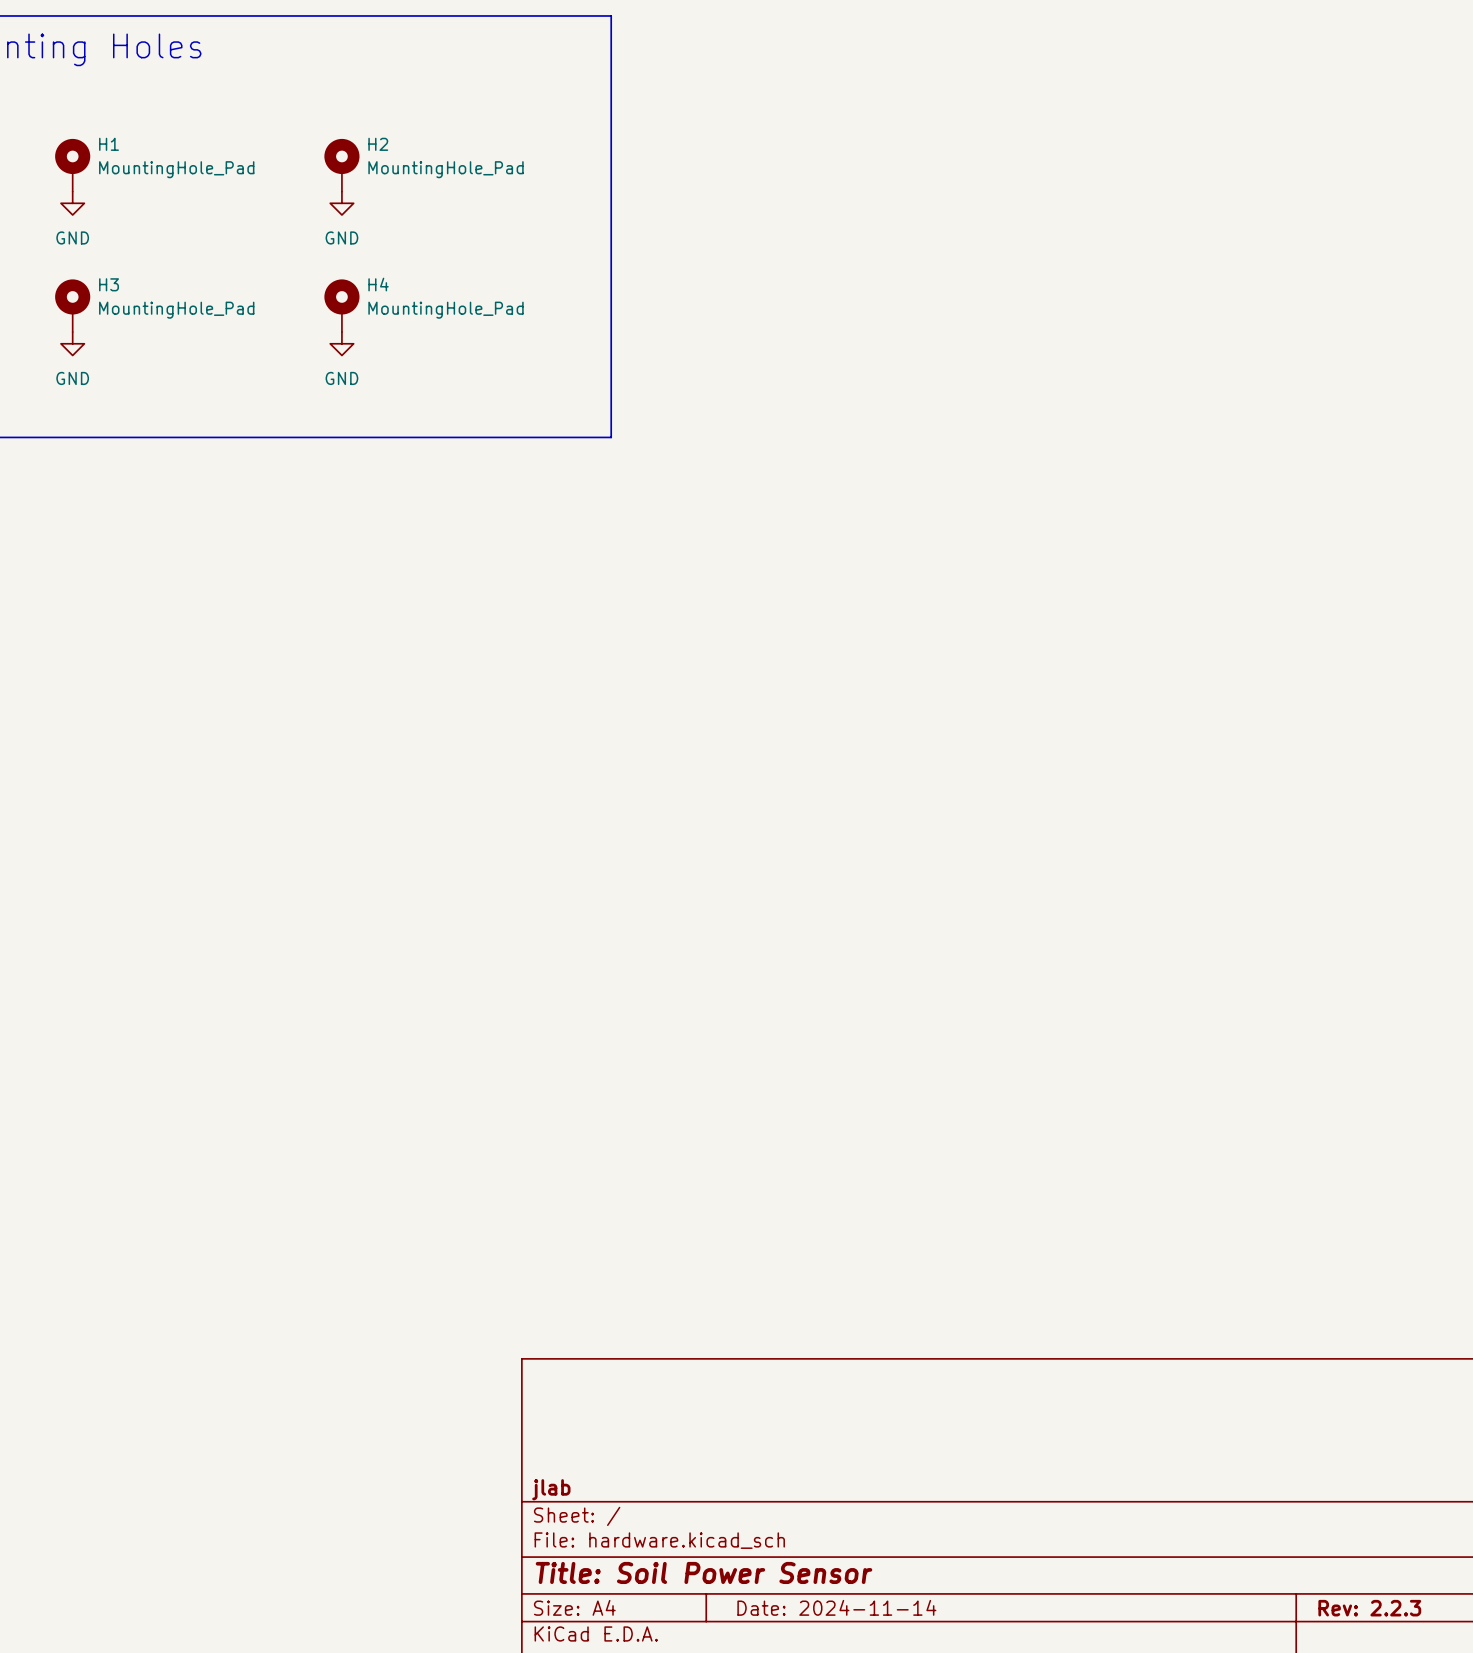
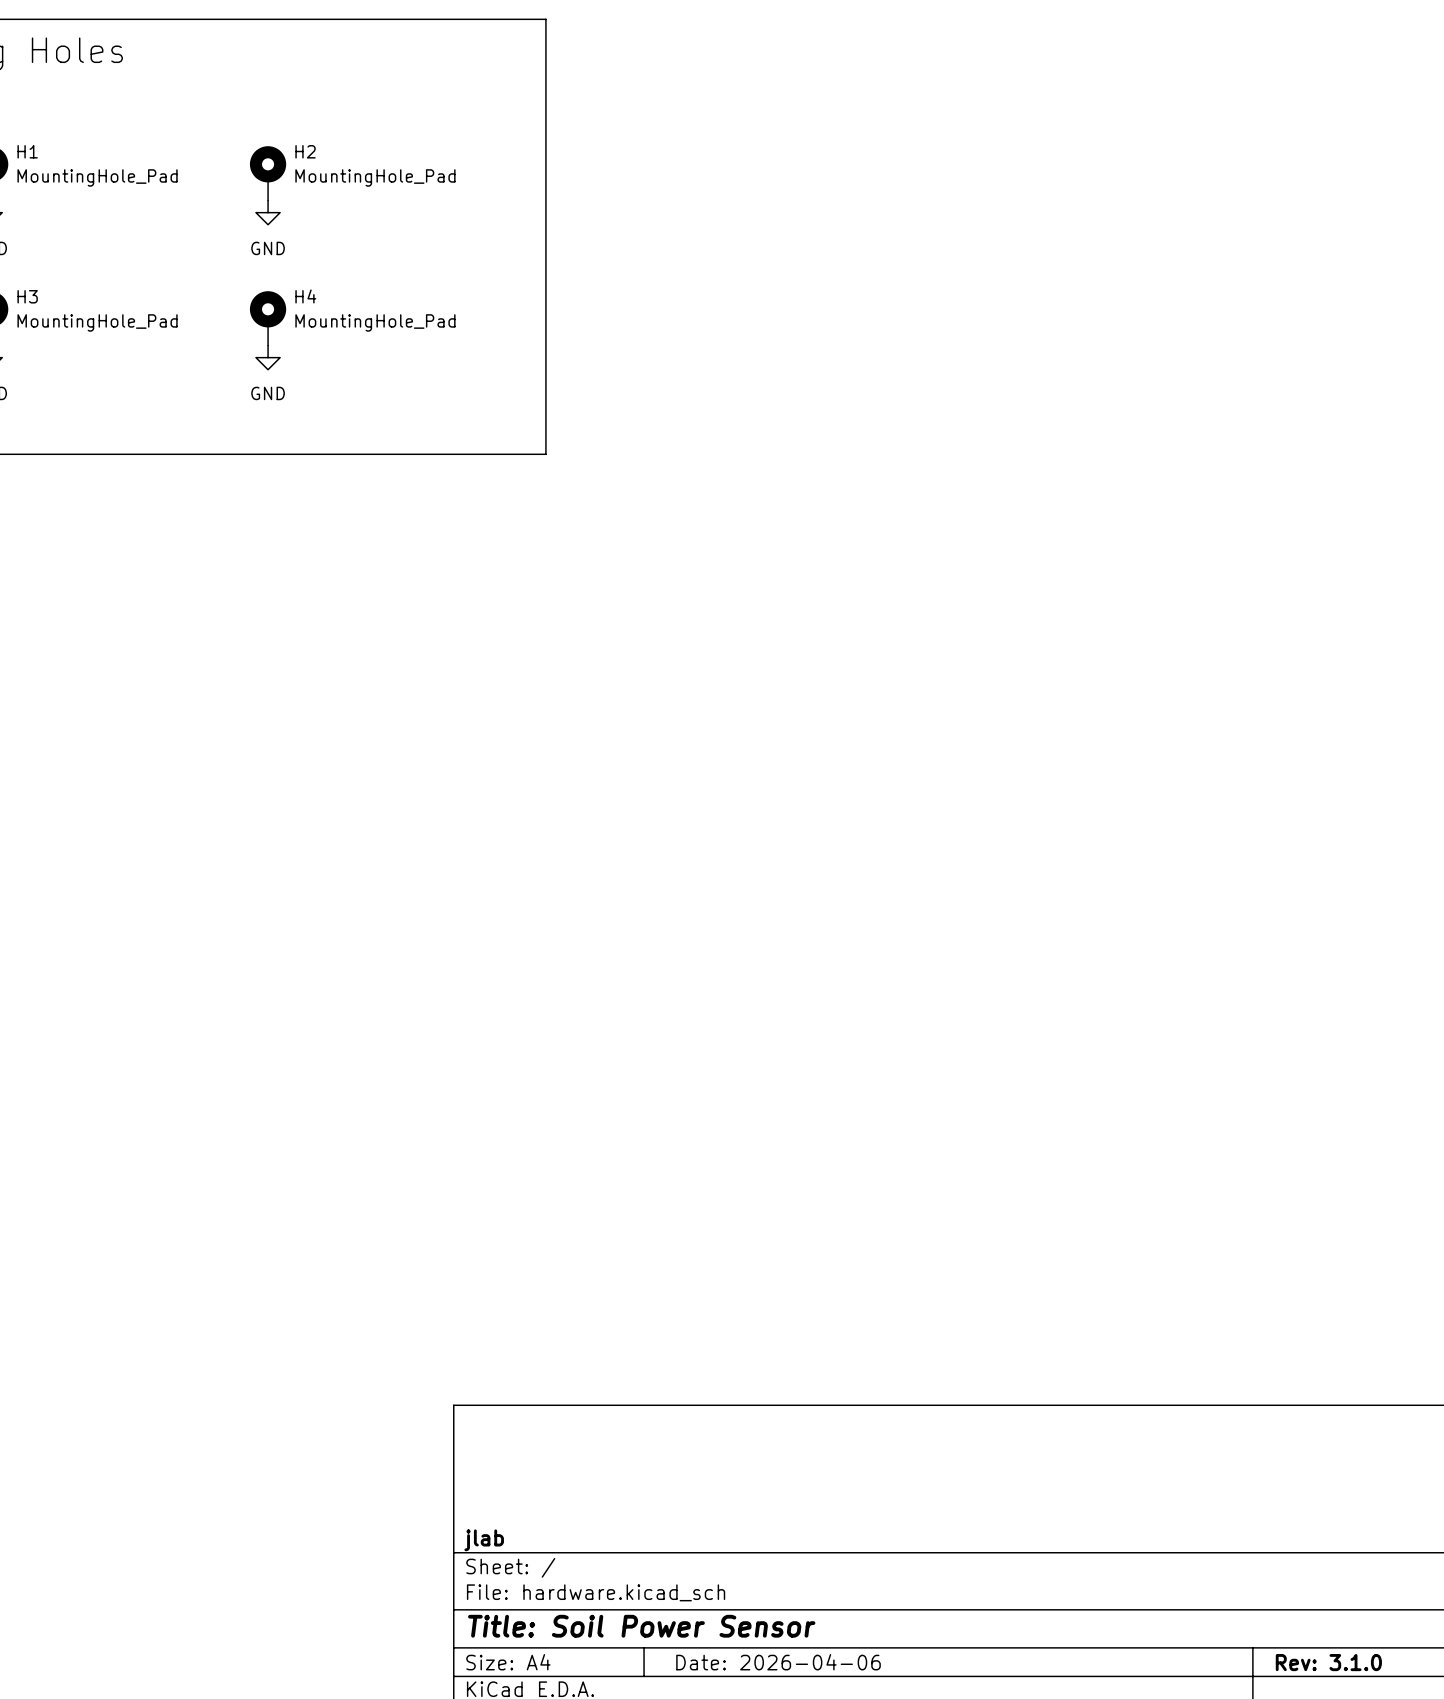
title block: Date: 2024-11-14 (836, 1607) -> Date: 2026-04-06 (778, 1662)
title block: Rev: 2.2.3 (1369, 1608) -> Rev: 3.1.0 (1328, 1662)

